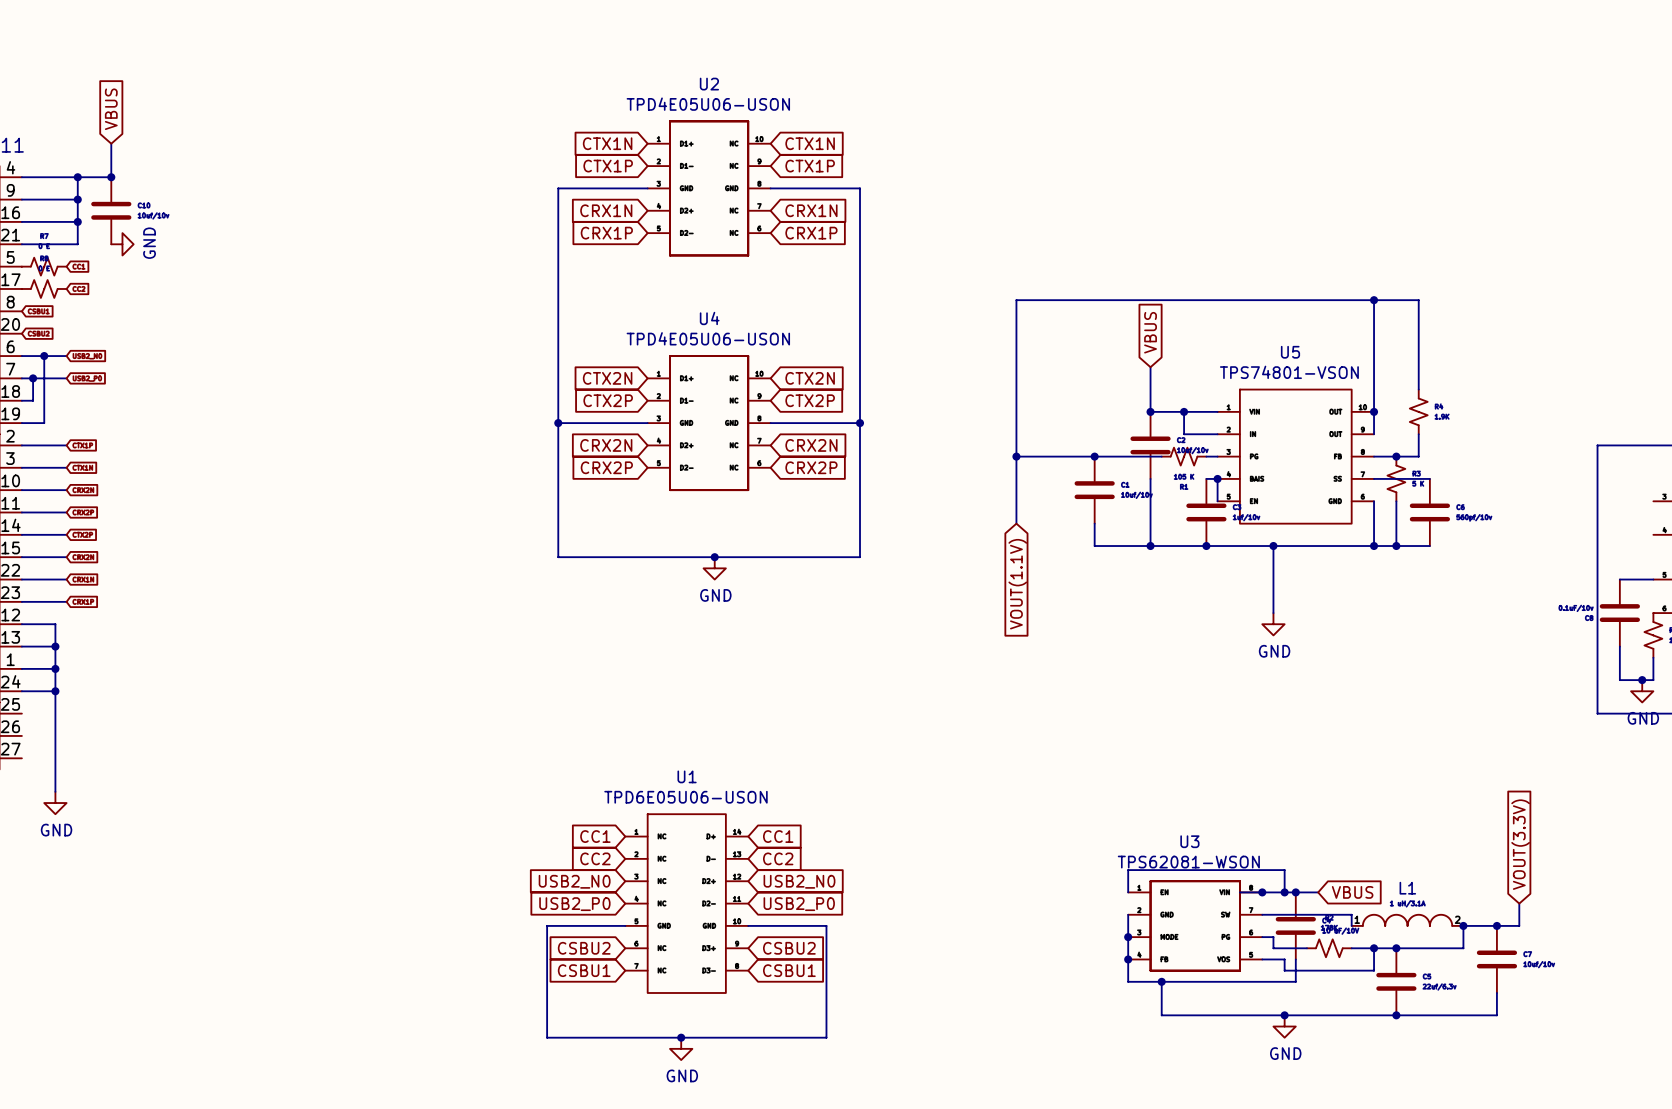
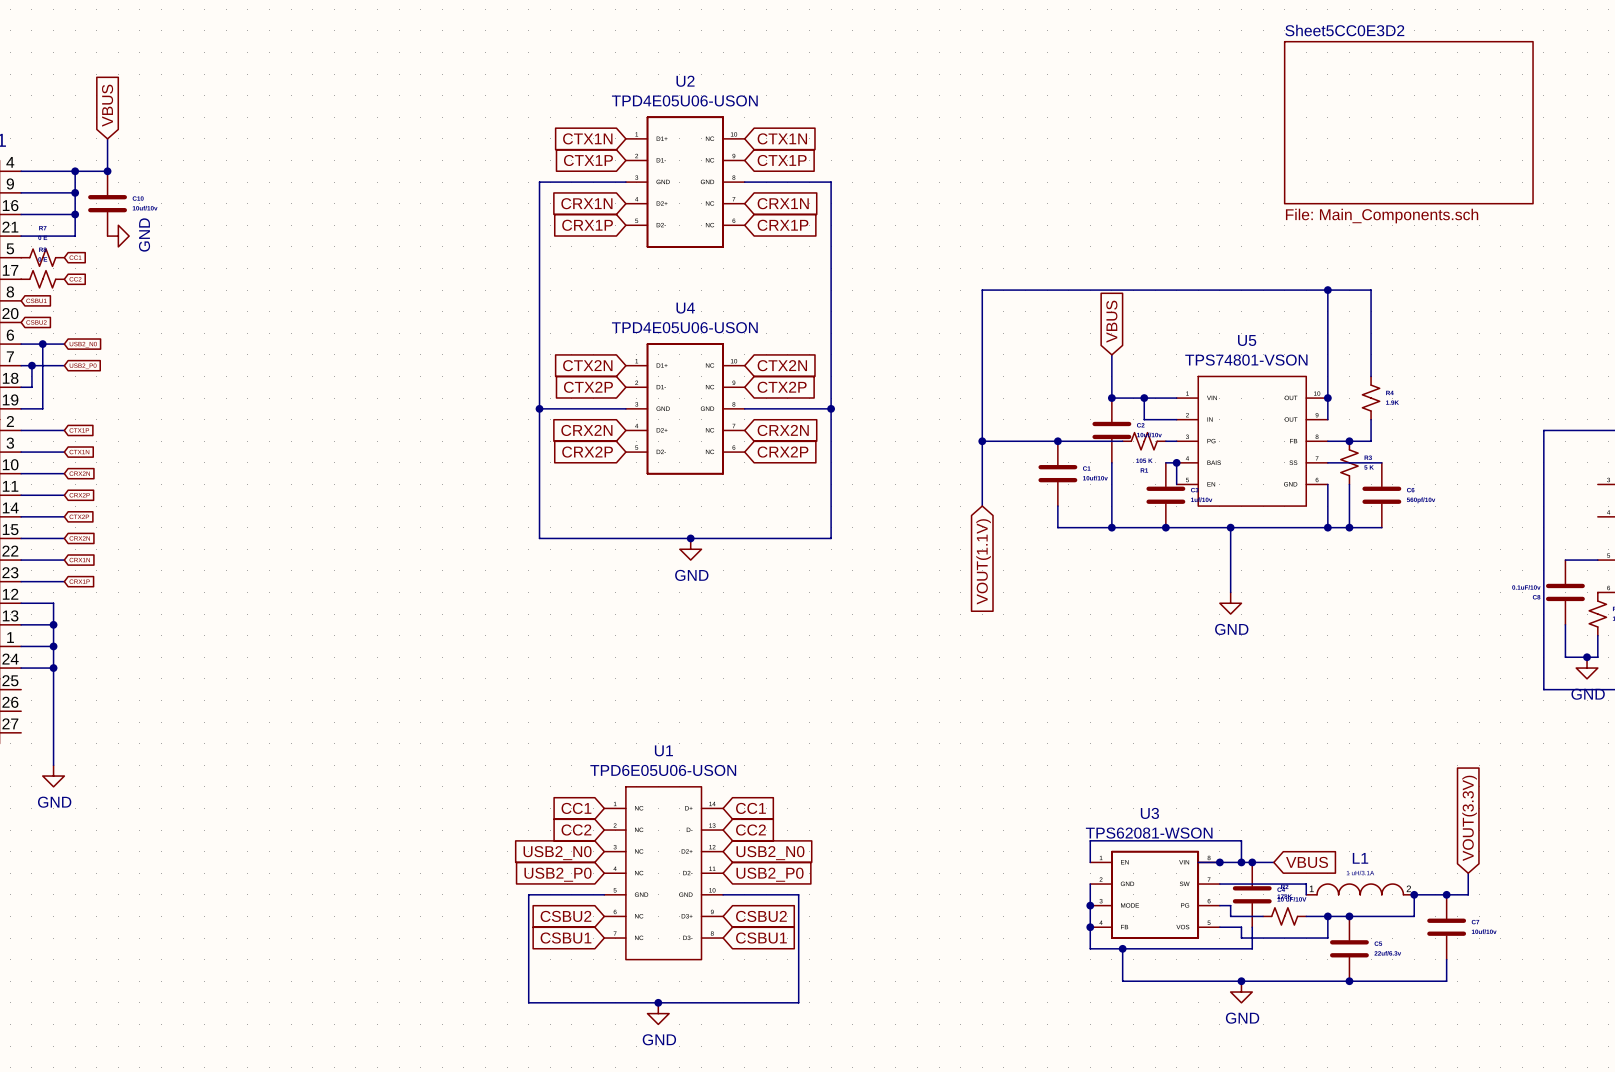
sheet Sheet5CC0E3D2: none -> File: Main_Components.sch (1408, 122)

